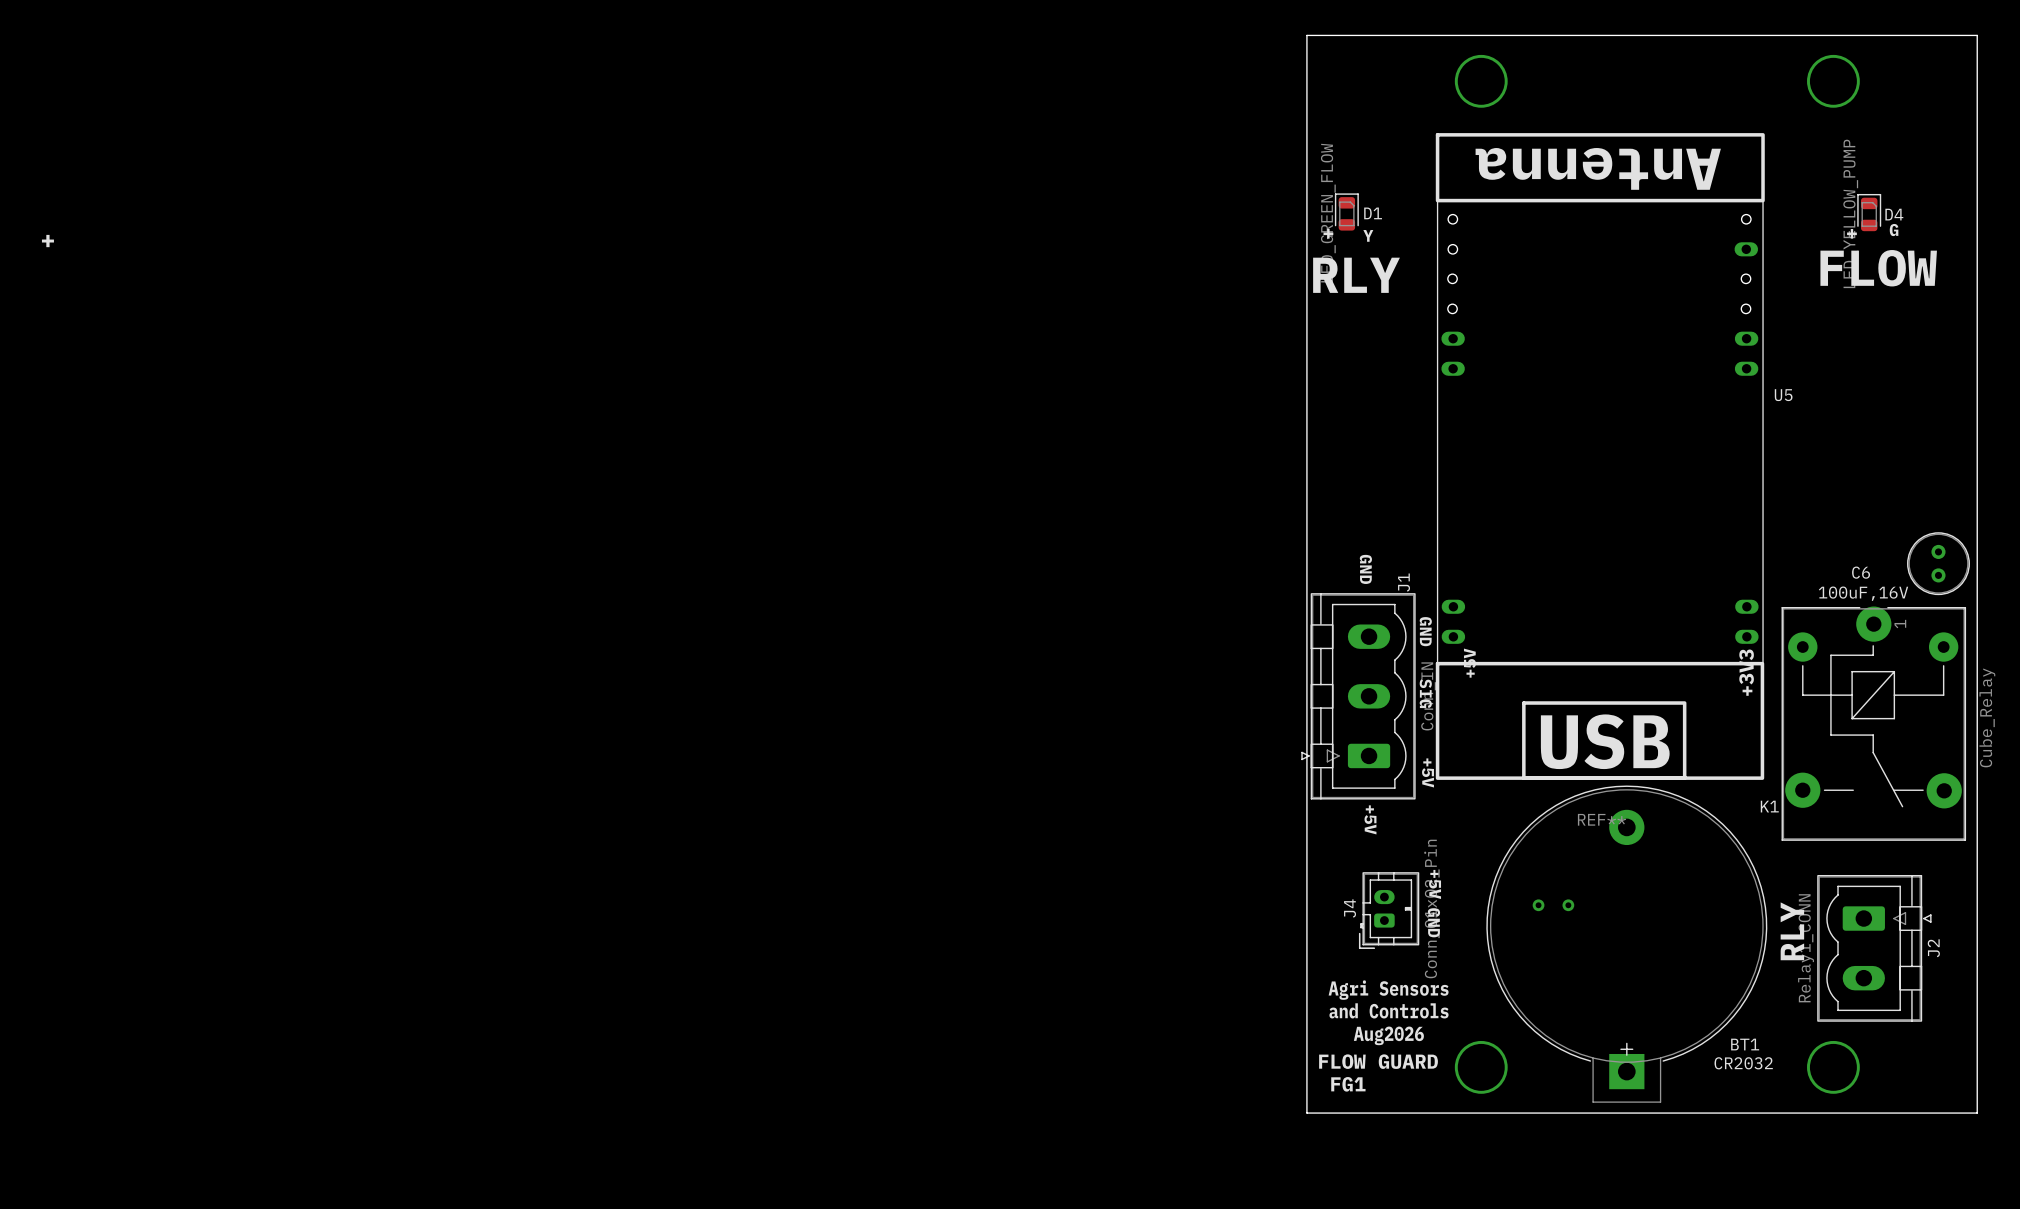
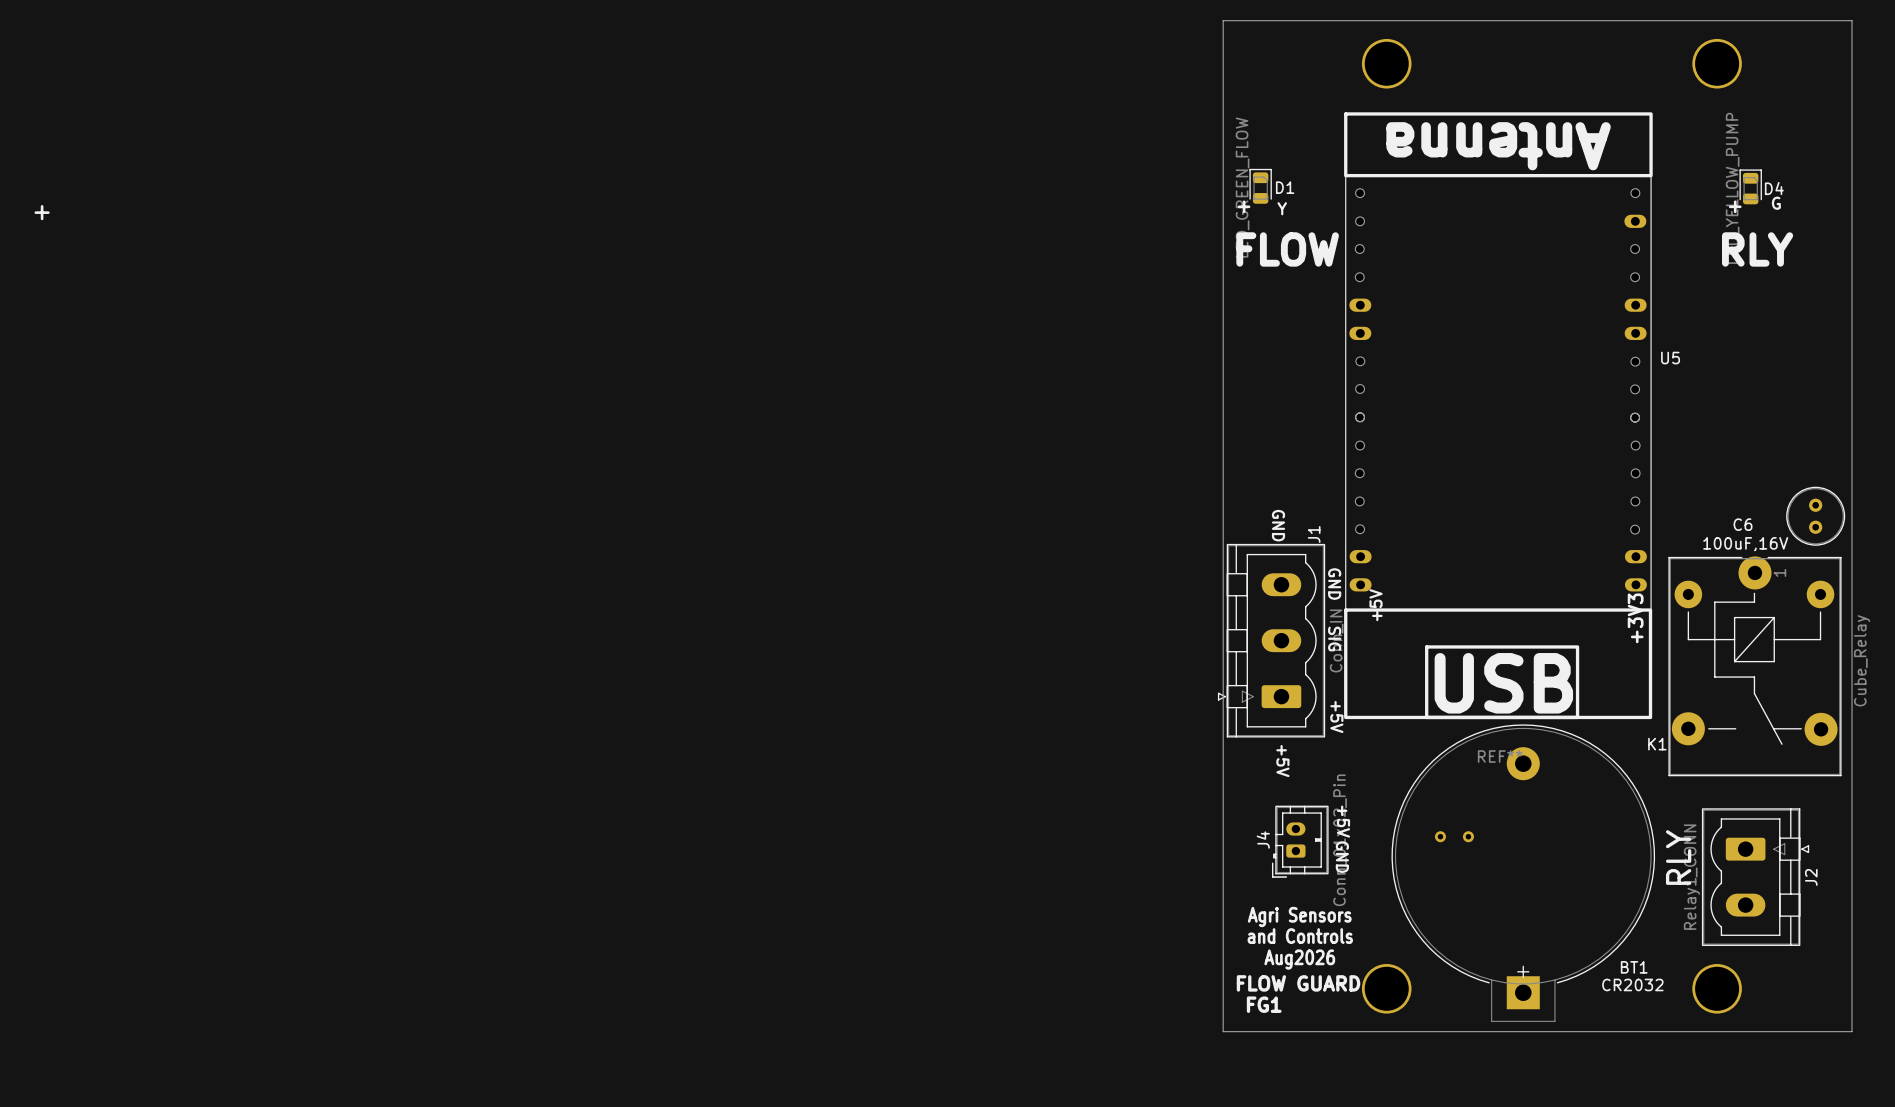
U5 footprint: [1435, 133, 1765, 780] -> [1344, 112, 1653, 720]
text: FLOW (1878, 268) -> none
text: RLY (1356, 275) -> FLOW (1287, 249)
text: none -> RLY (1757, 249)

